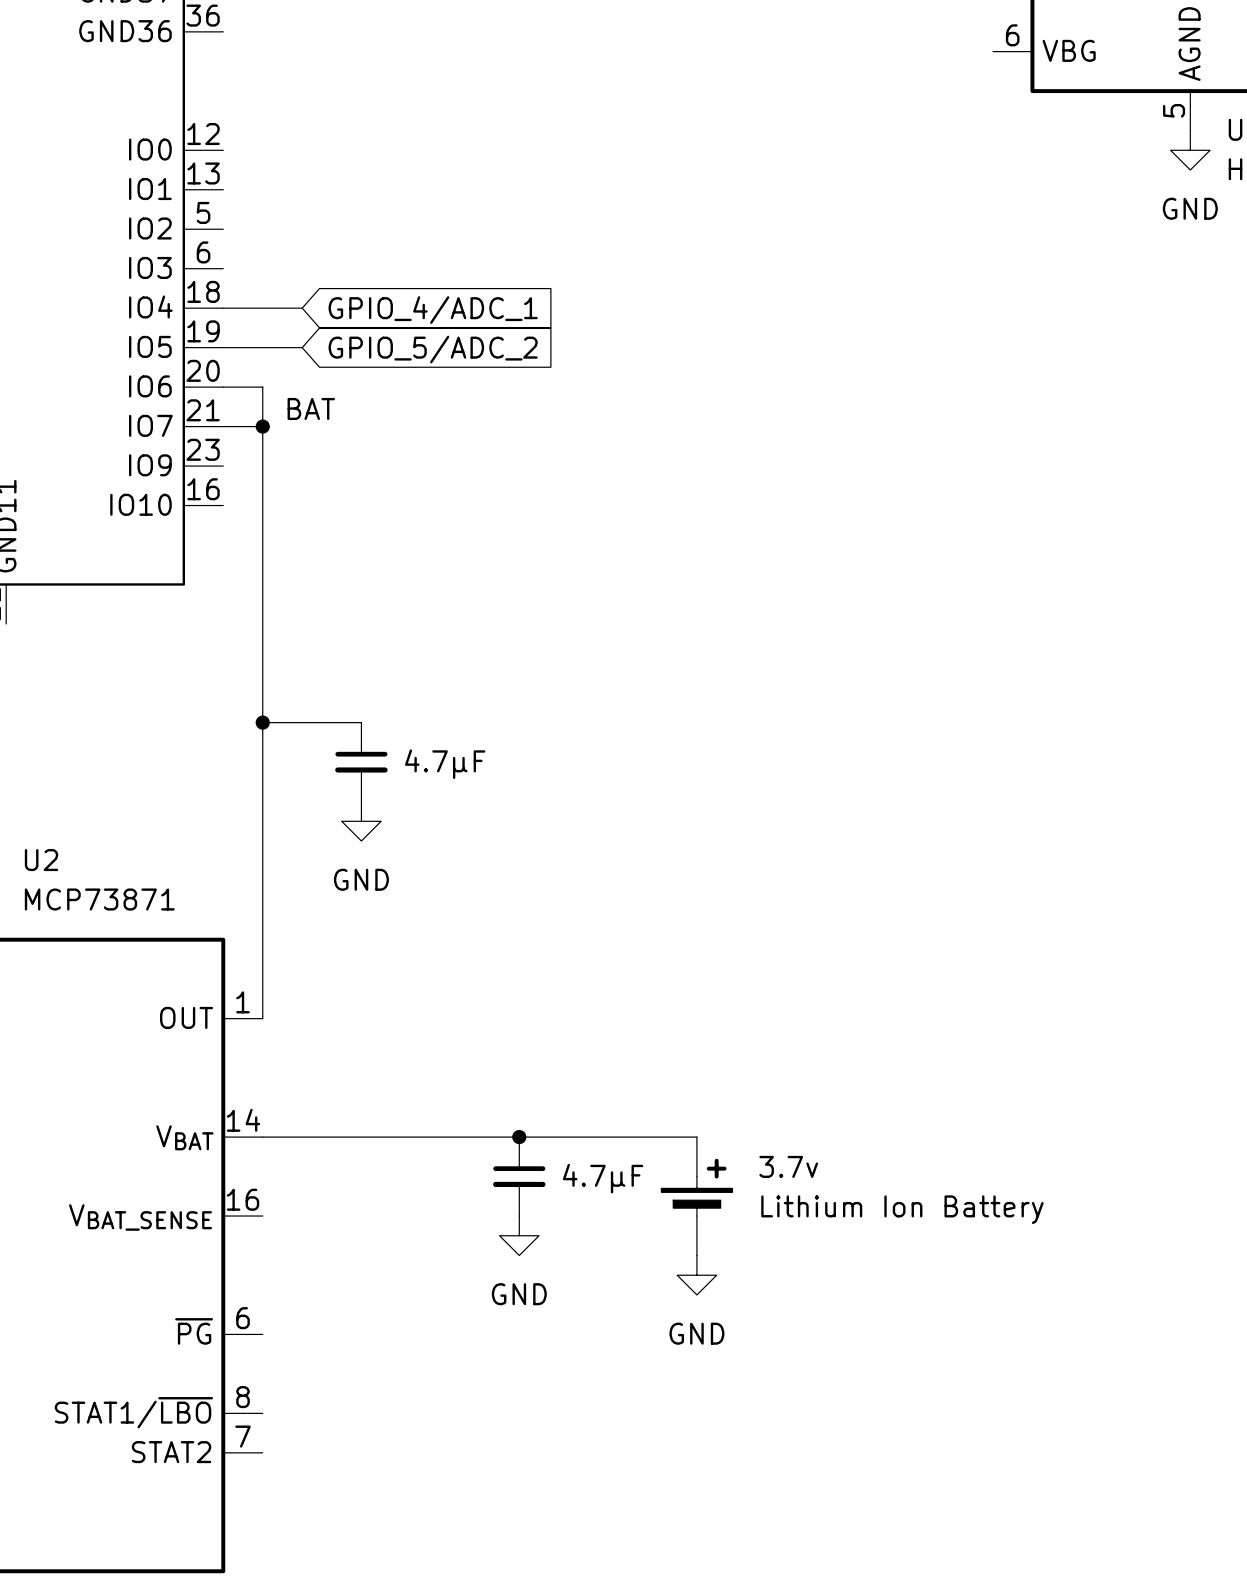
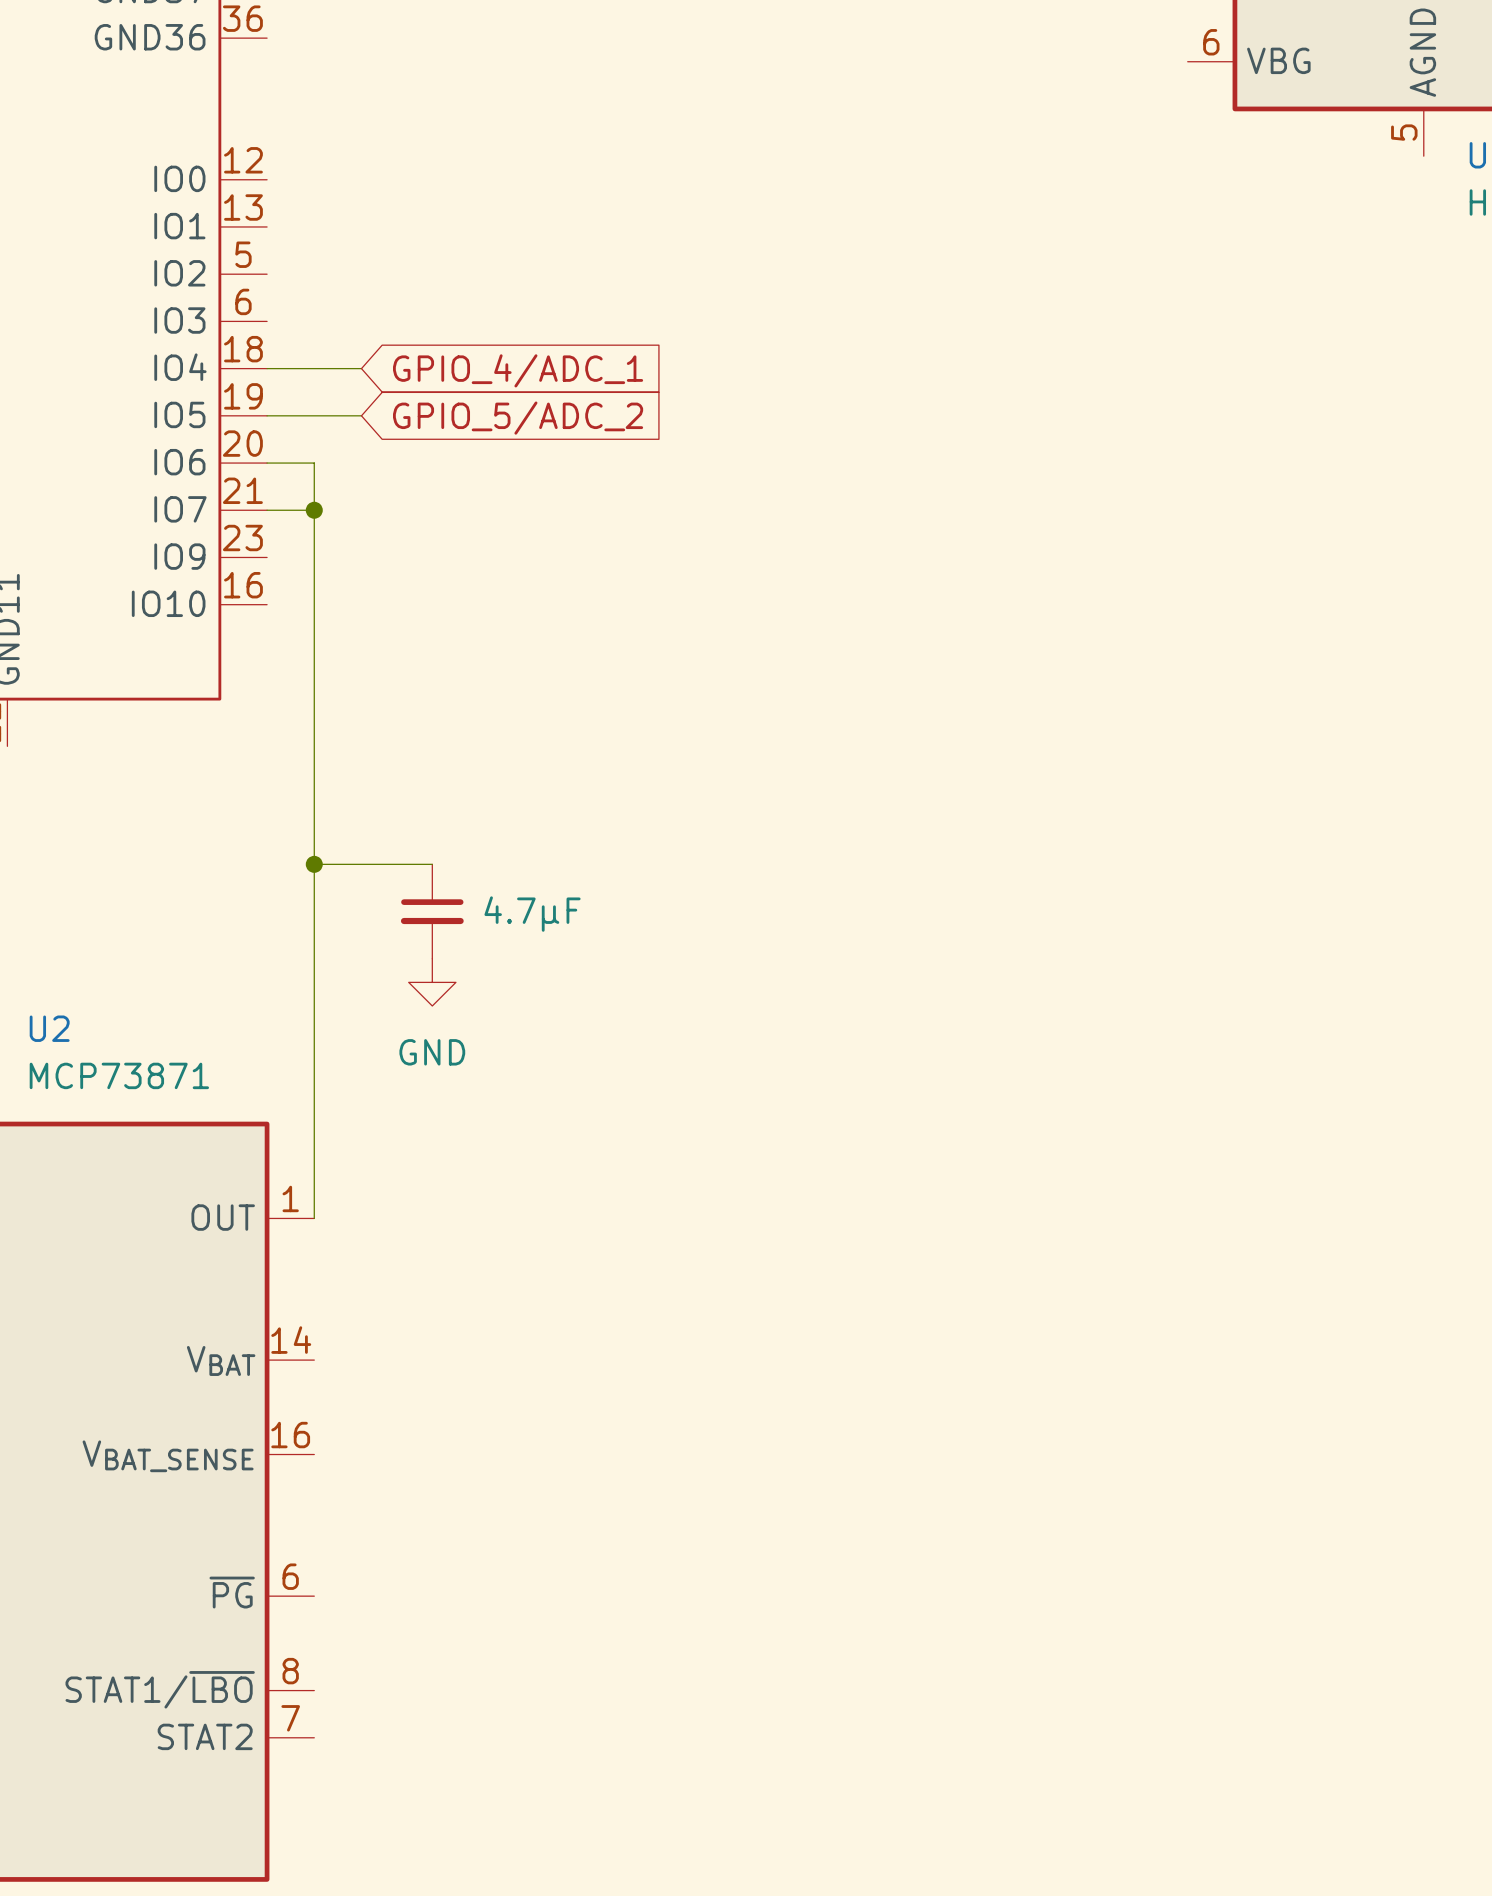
power symbol: GND (1190, 150) -> none
label: BAT (311, 408) -> none
wire: (262, 1137) (696, 1137) -> none
junction: (519, 1137) -> none
part: 4.7μF (519, 1176) -> none
3.7v: Lithium Ion Battery (696, 1196) -> none
power symbol: GND (519, 1235) -> none
power symbol: GND (696, 1275) -> none

